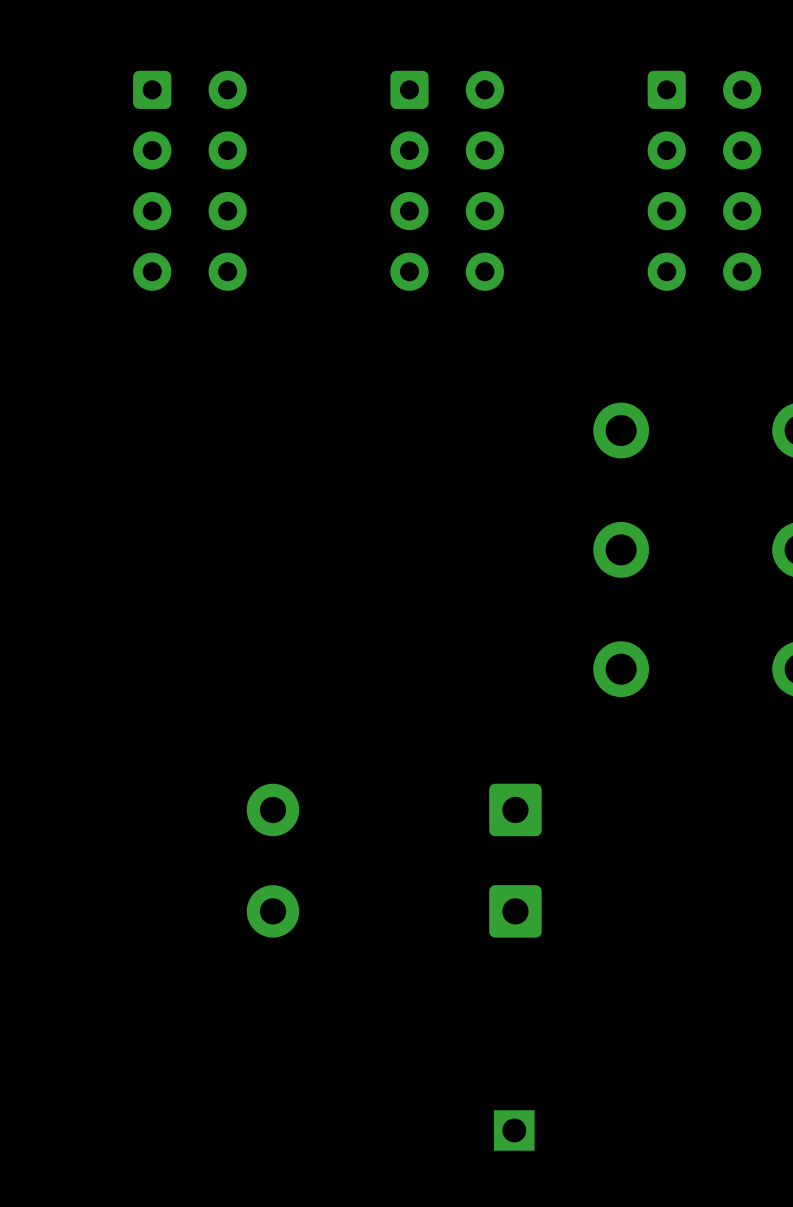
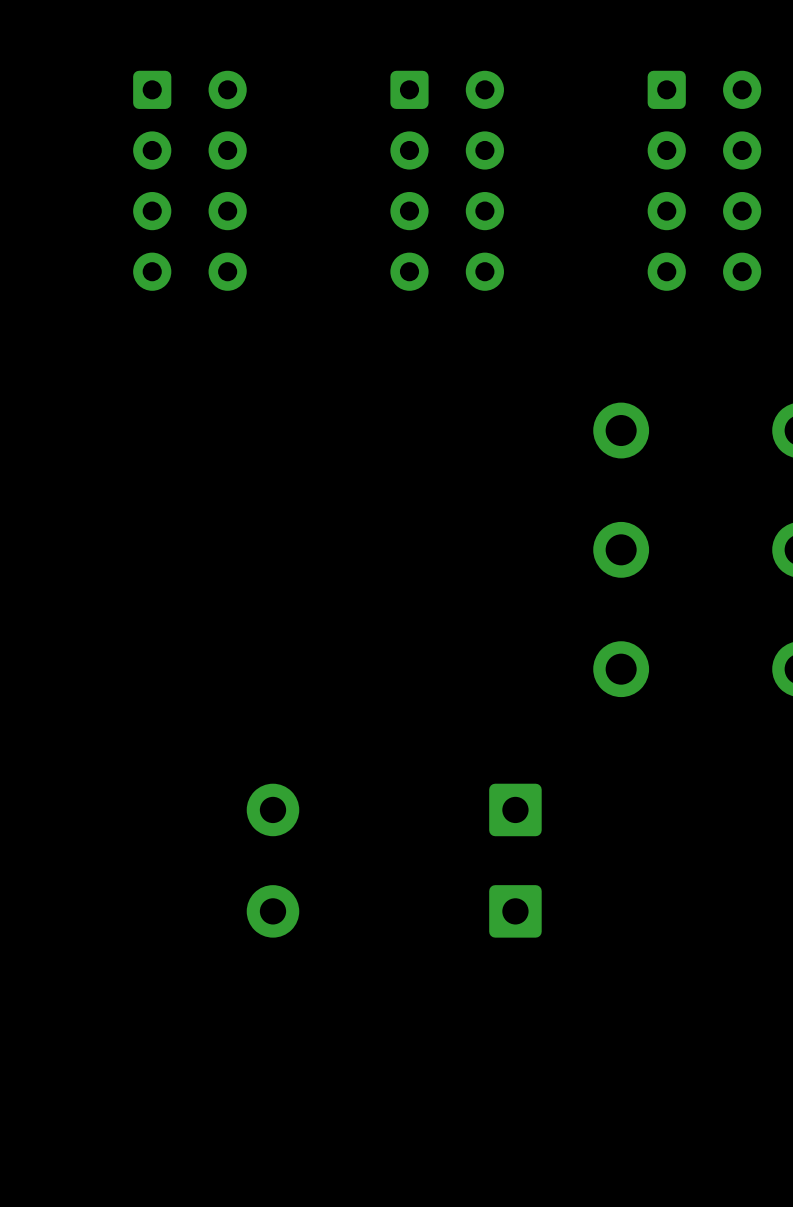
part: (514, 1130) -> none

